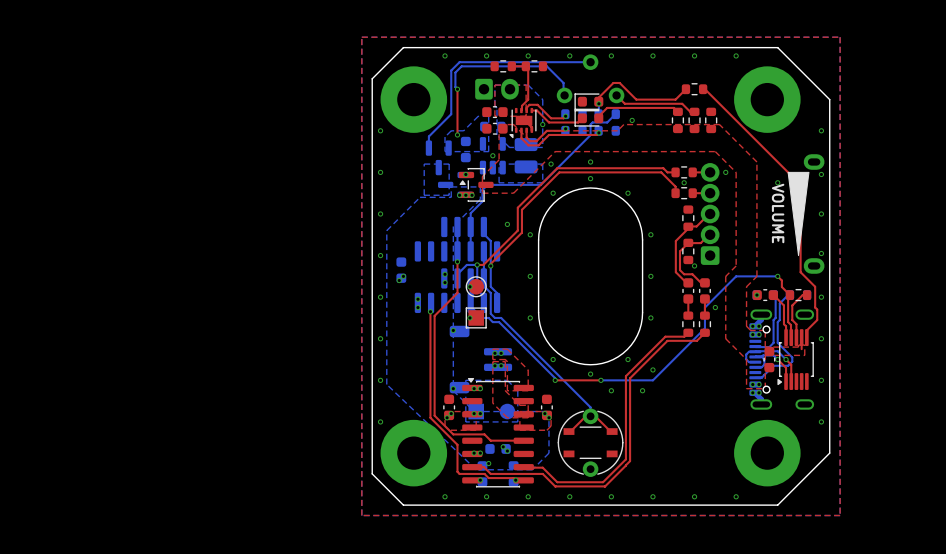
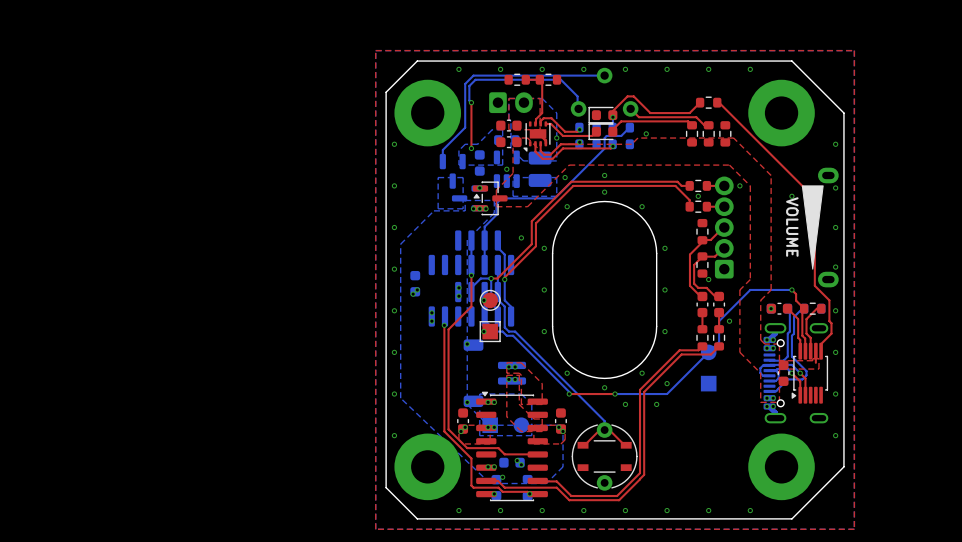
part: none -> (708, 352)
part: none -> (708, 383)

